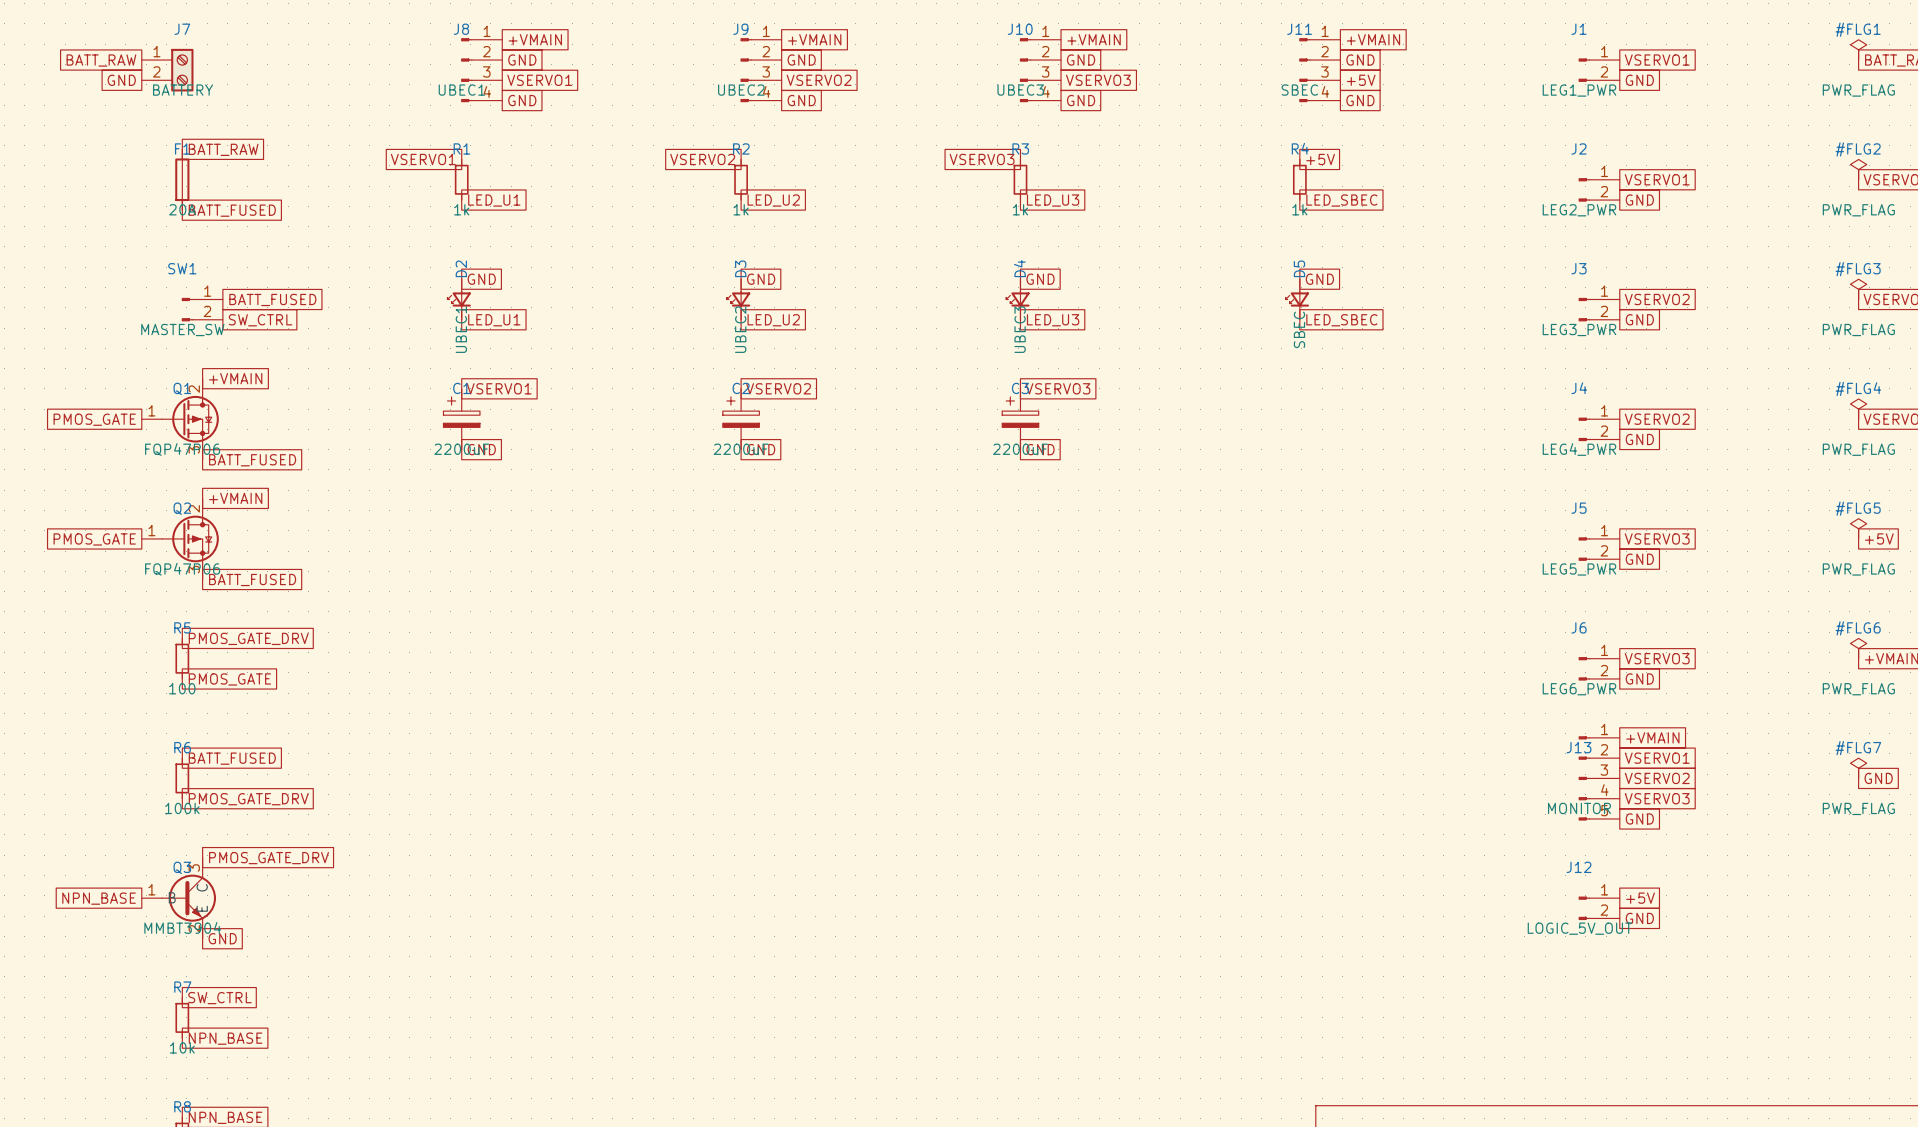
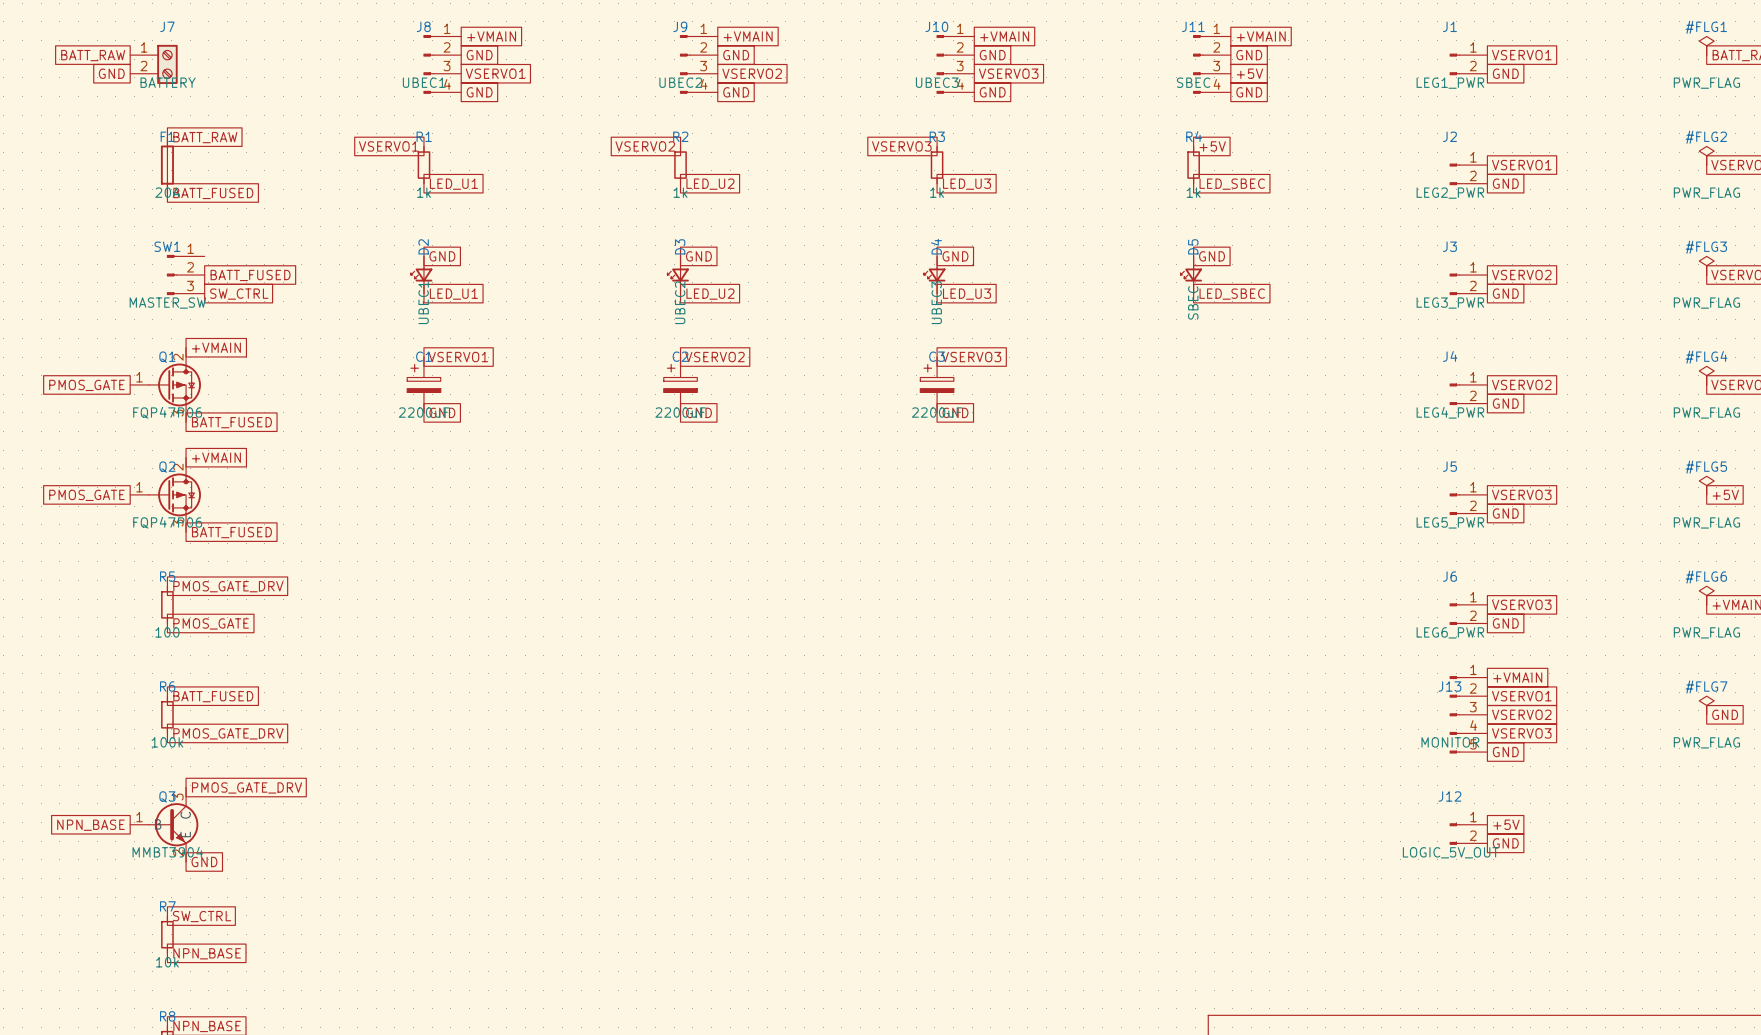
SW1 symbol: [181, 297, 223, 322] -> [166, 254, 205, 296]

